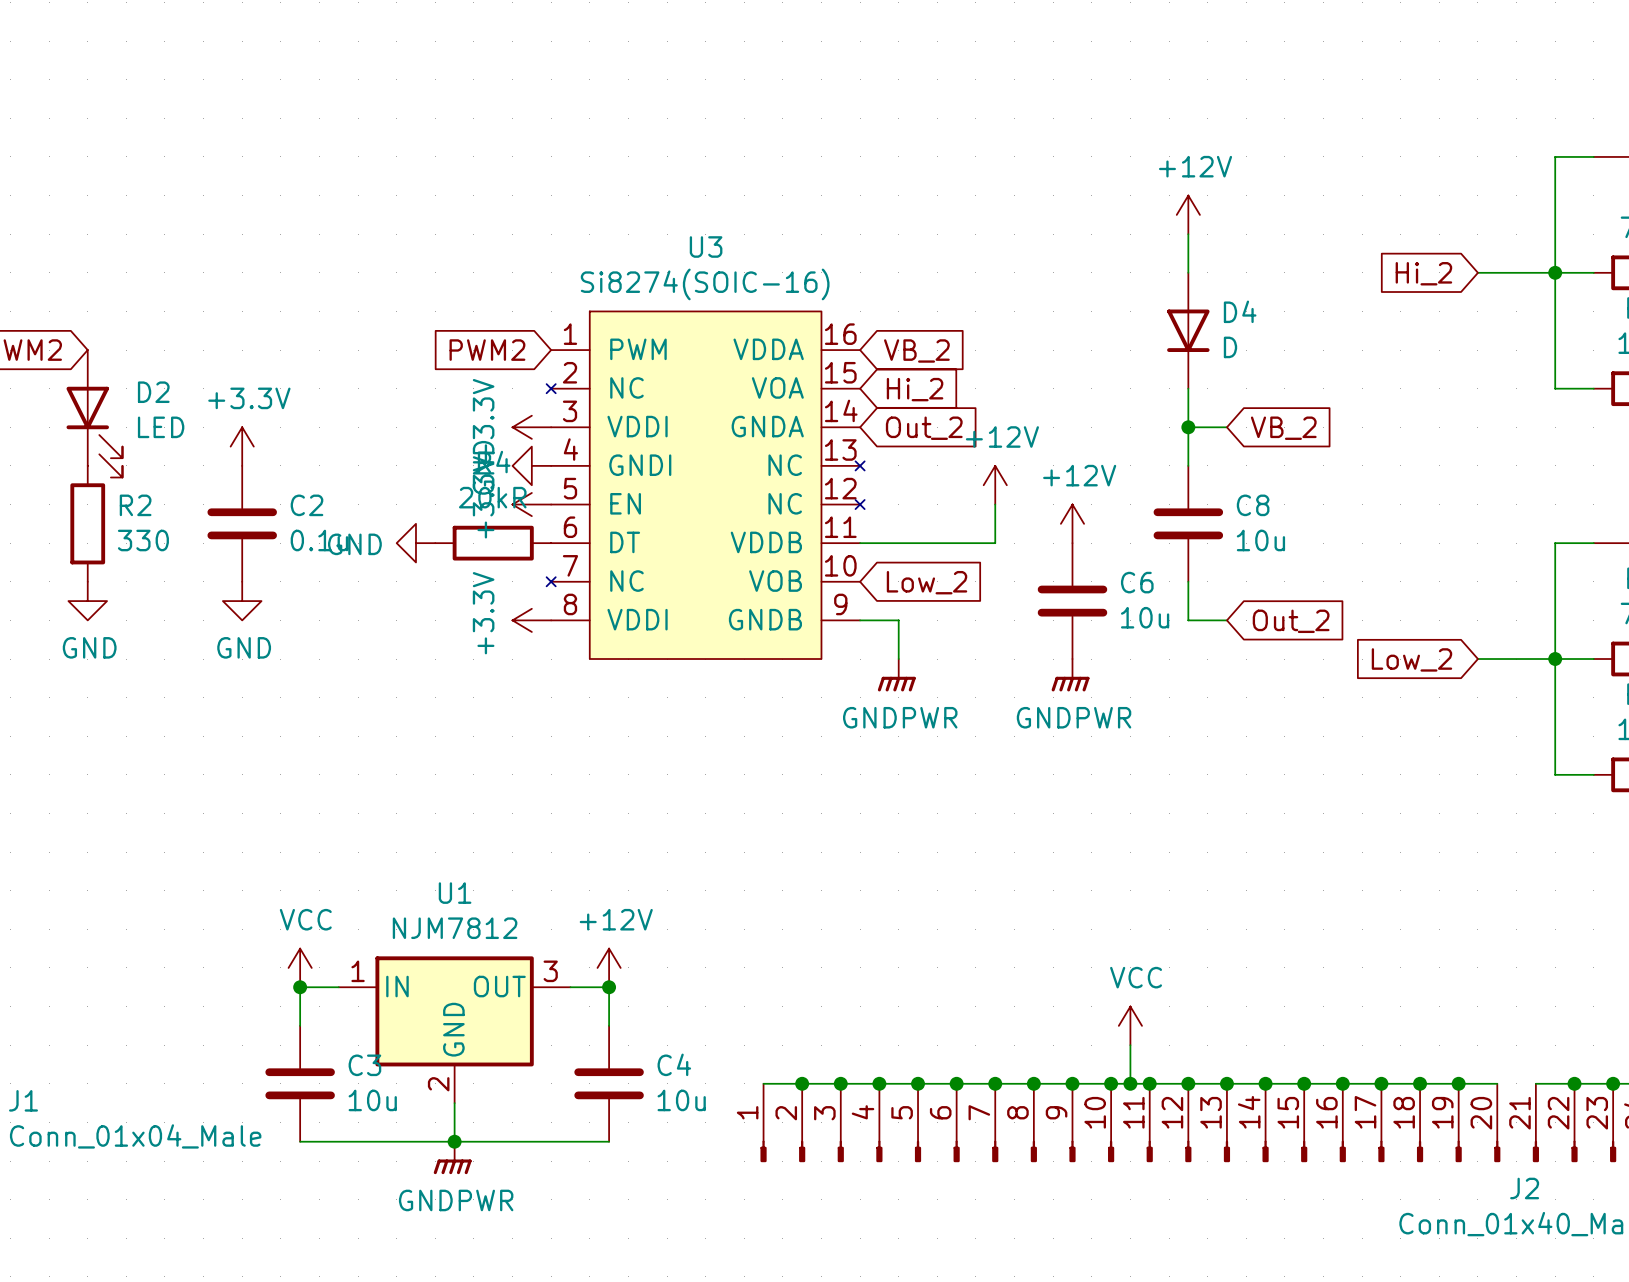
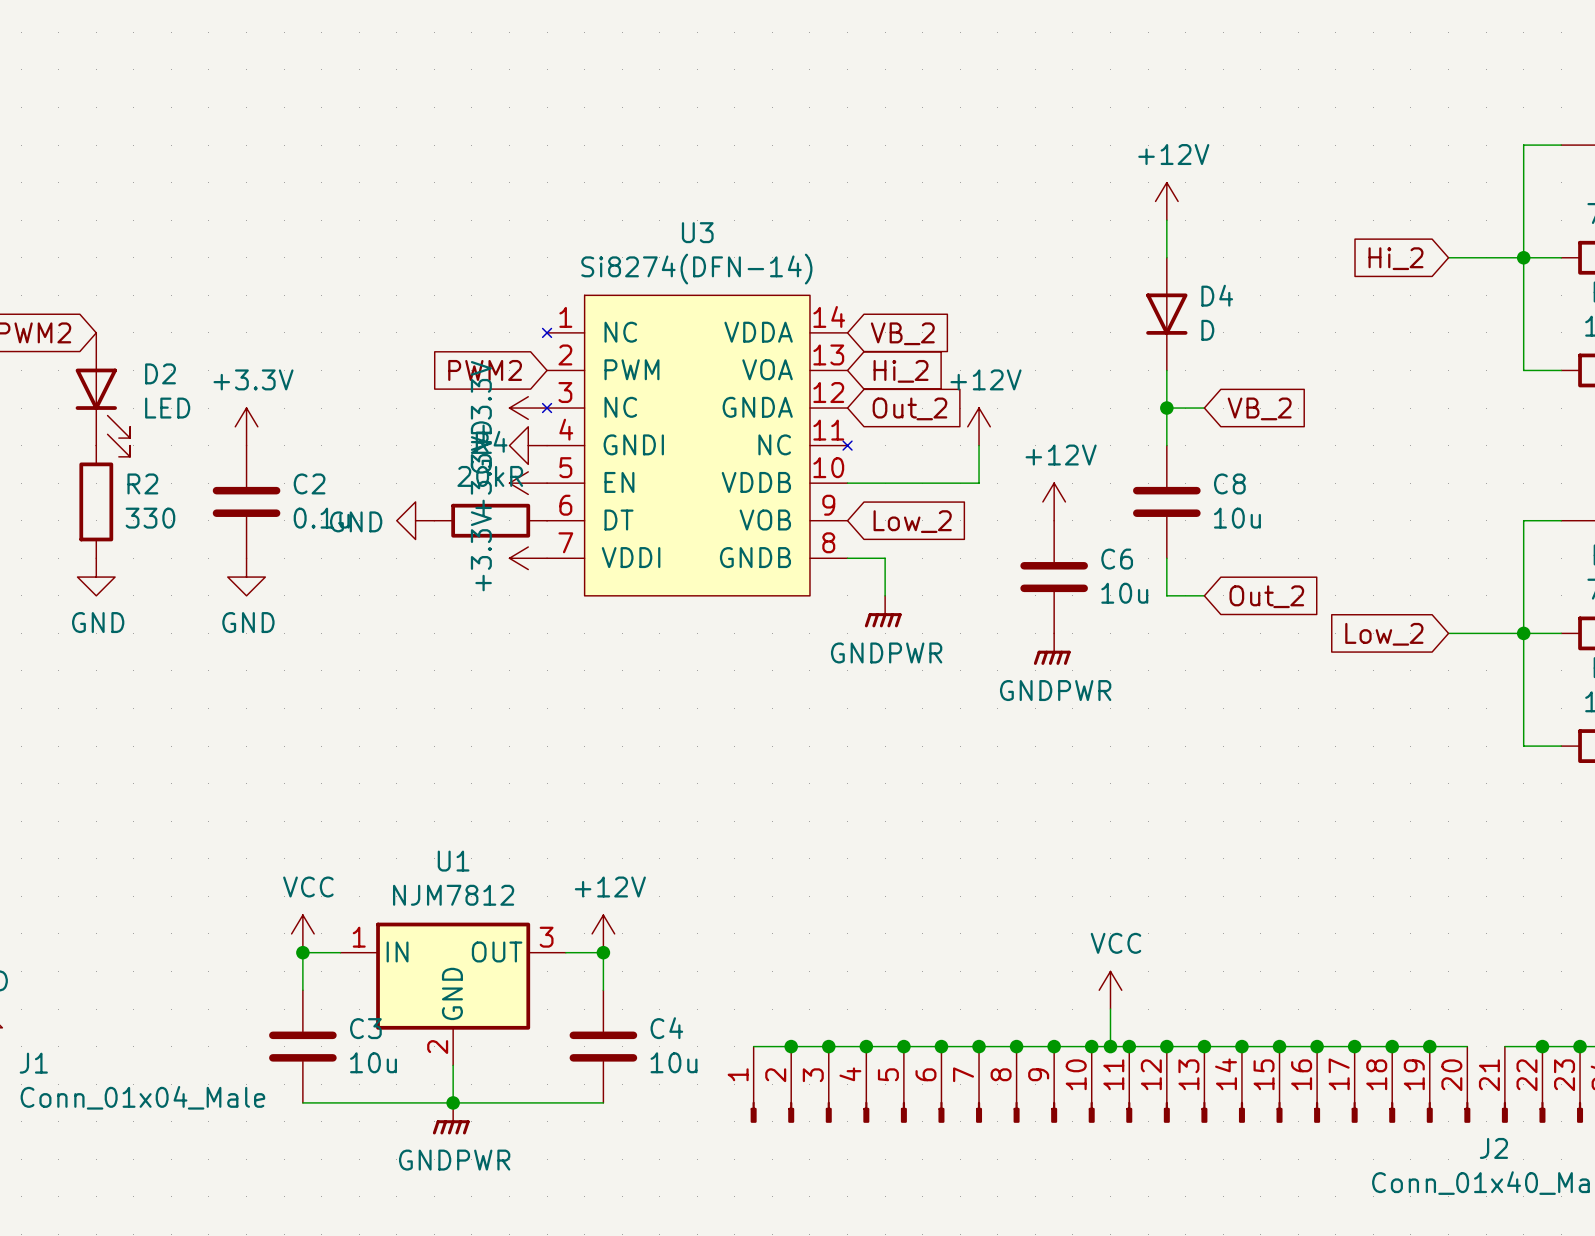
U3 value: Si8274(SOIC-16) (705, 284) -> Si8274(DFN-14) (696, 269)
U3 symbol: [546, 311, 865, 660] -> [542, 295, 852, 596]
global label position: PWM2 (487, 350) -> PWM2 (485, 370)
power symbol position: +12V (995, 485) -> +12V (979, 426)
wire: (995, 504) (995, 543) (860, 543) -> (979, 445) (979, 483) (847, 483)
global label position: Low_2 (927, 582) -> Low_2 (912, 521)
power symbol position: +3.3V (531, 620) -> +3.3V (528, 558)
wire: (860, 620) (898, 620) (898, 659) -> (847, 558) (885, 558) (885, 595)
power symbol position: GNDPWR (896, 675) -> GNDPWR (883, 611)

